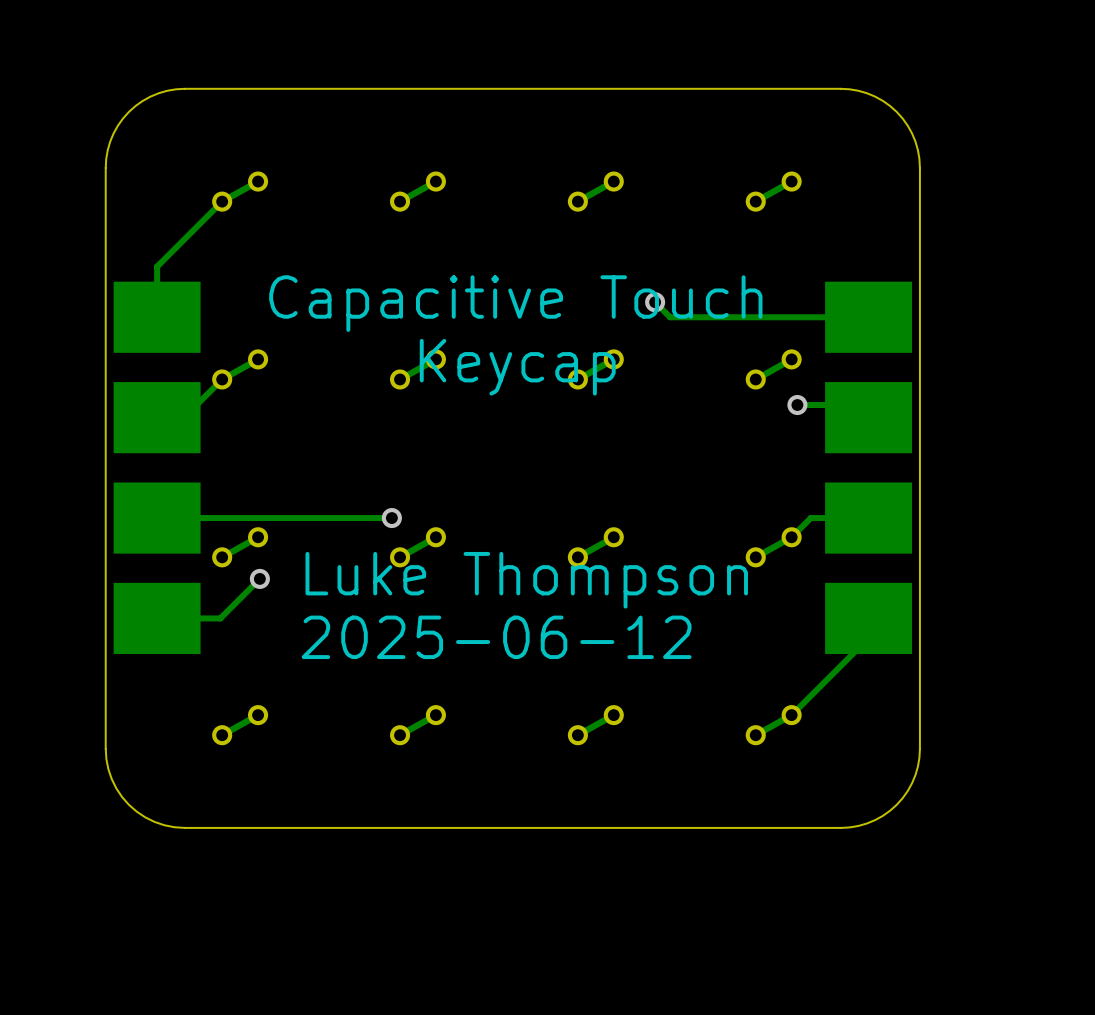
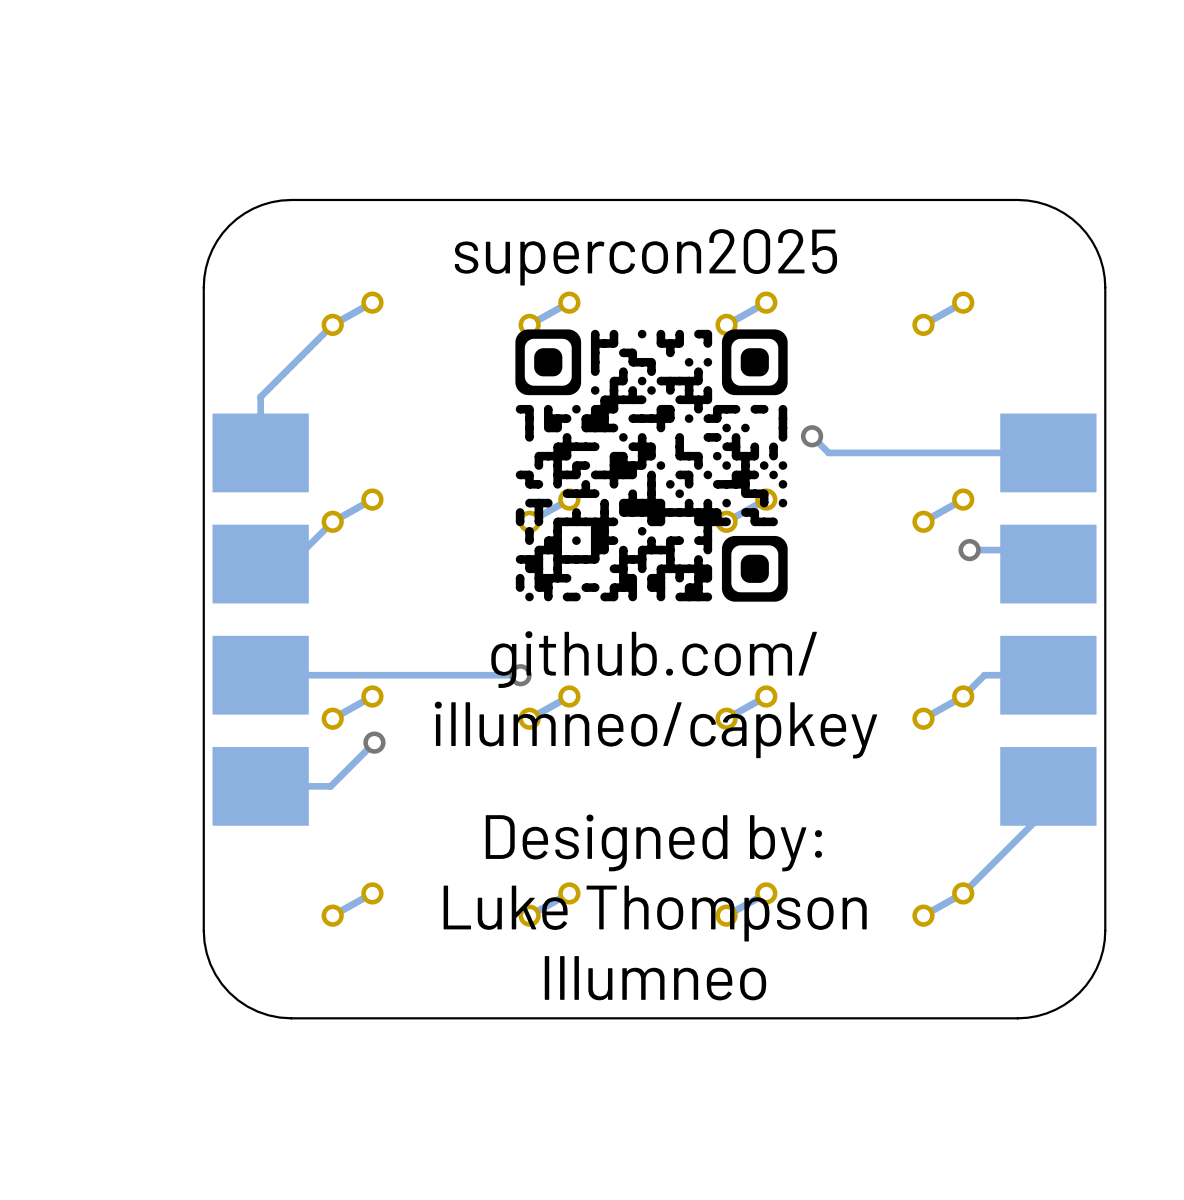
text: none -> supercon2025 (645, 257)
drawing: none -> [515, 329, 788, 602]
text: Capacitive Touch (515, 303) -> none
text: Keycap (517, 367) -> none
text: none -> github.com/ (654, 659)
text: none -> illumneo/capkey (656, 730)
text position: Luke Thompson (526, 580) -> Luke Thompson (655, 913)
text: 2025-06-12 (496, 637) -> none
text: none -> Designed by: (653, 842)
text: none -> Illumneo (655, 978)

